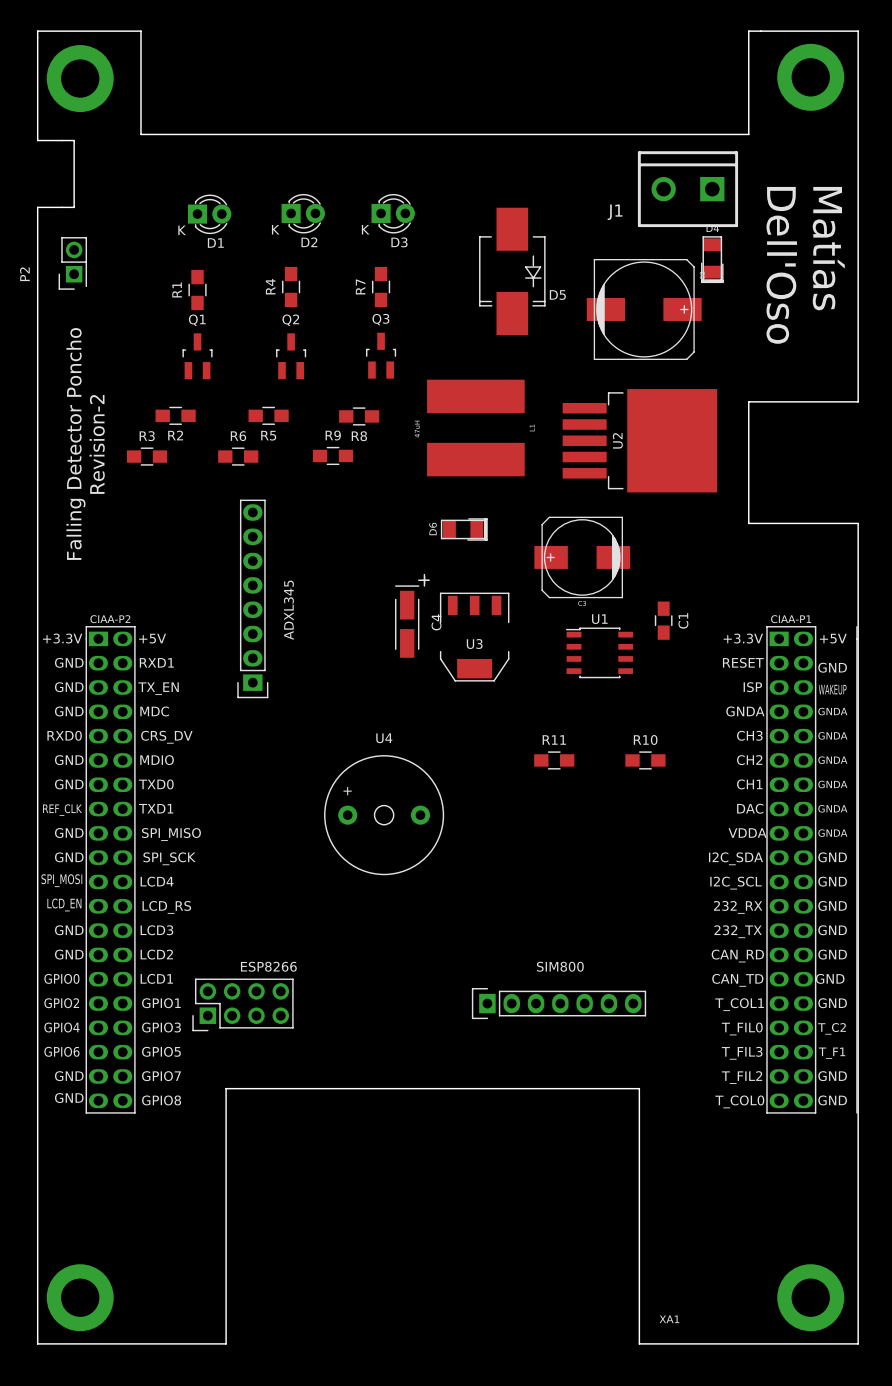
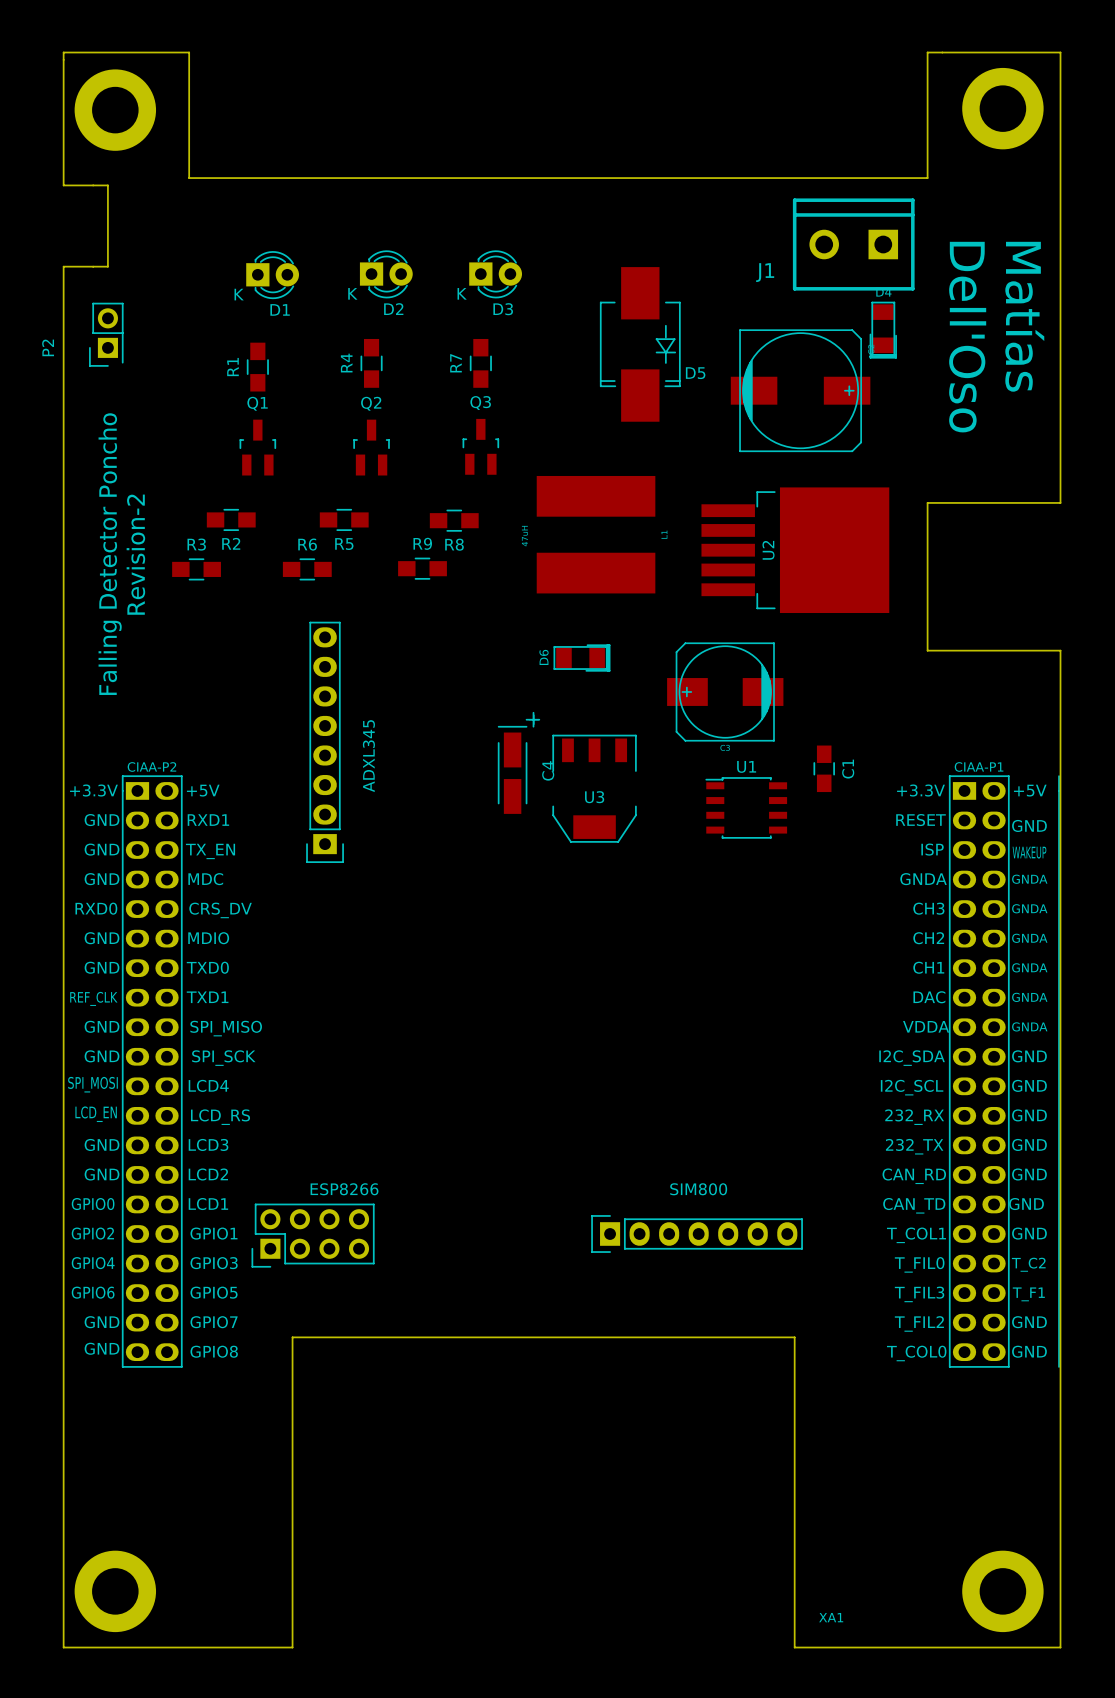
R11: (554, 760) -> none
R10: (645, 760) -> none
U4: (384, 815) -> none

